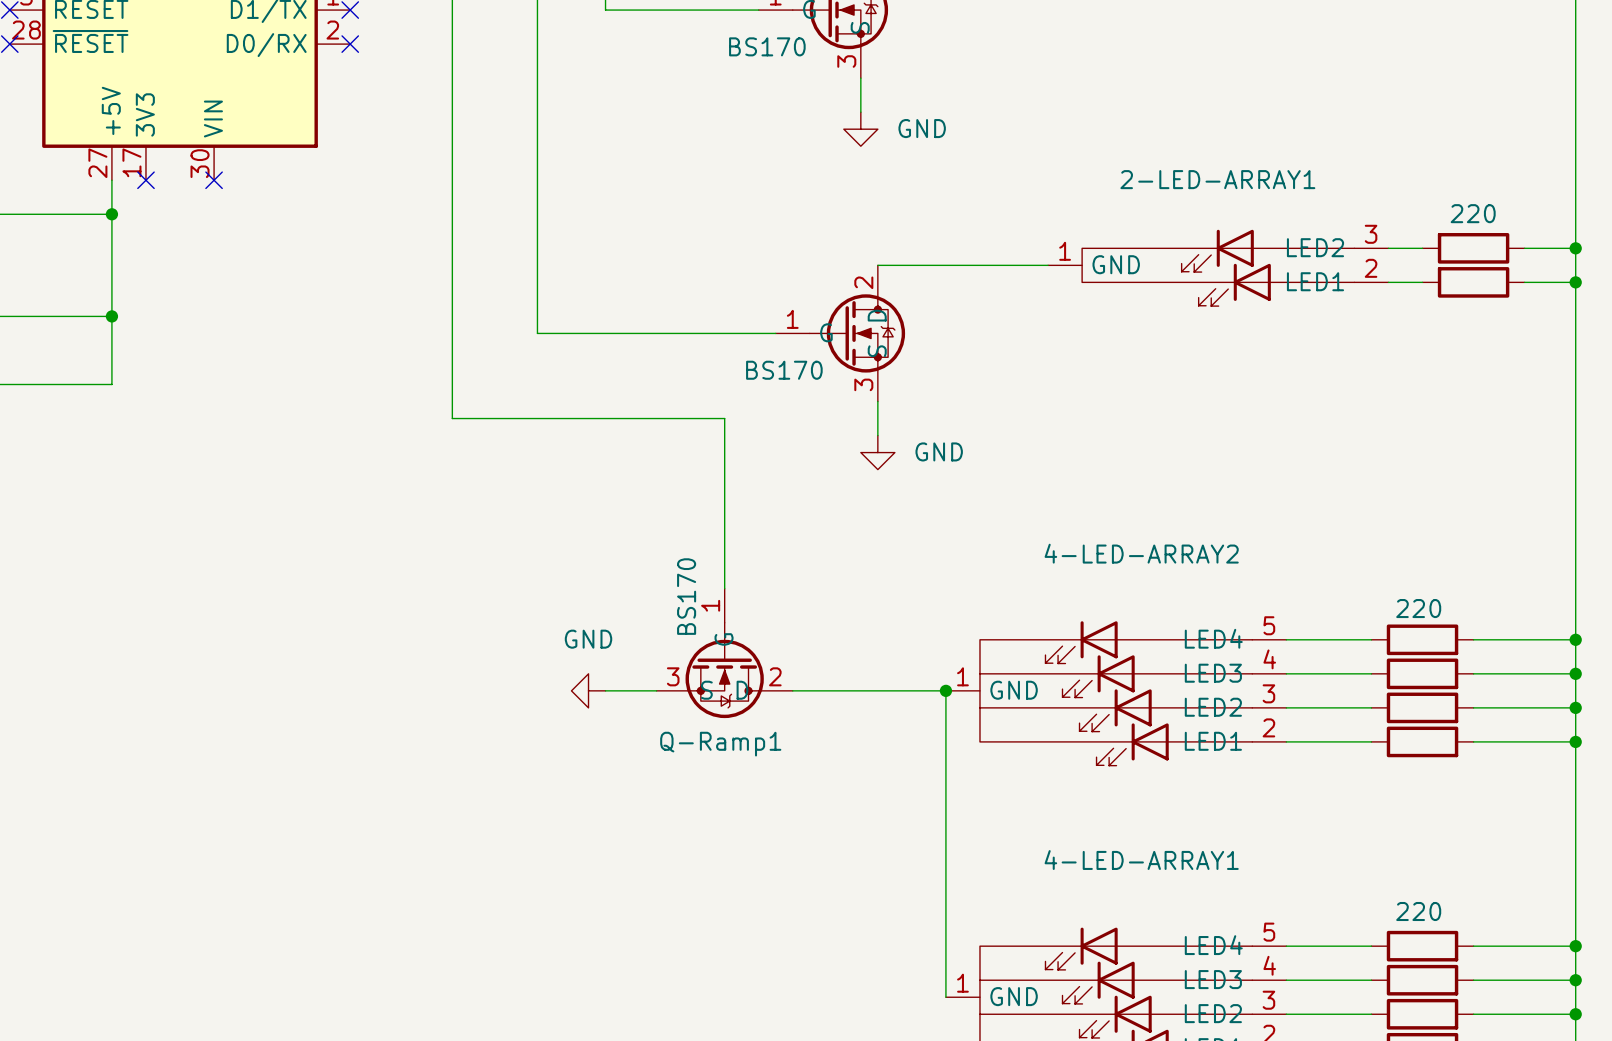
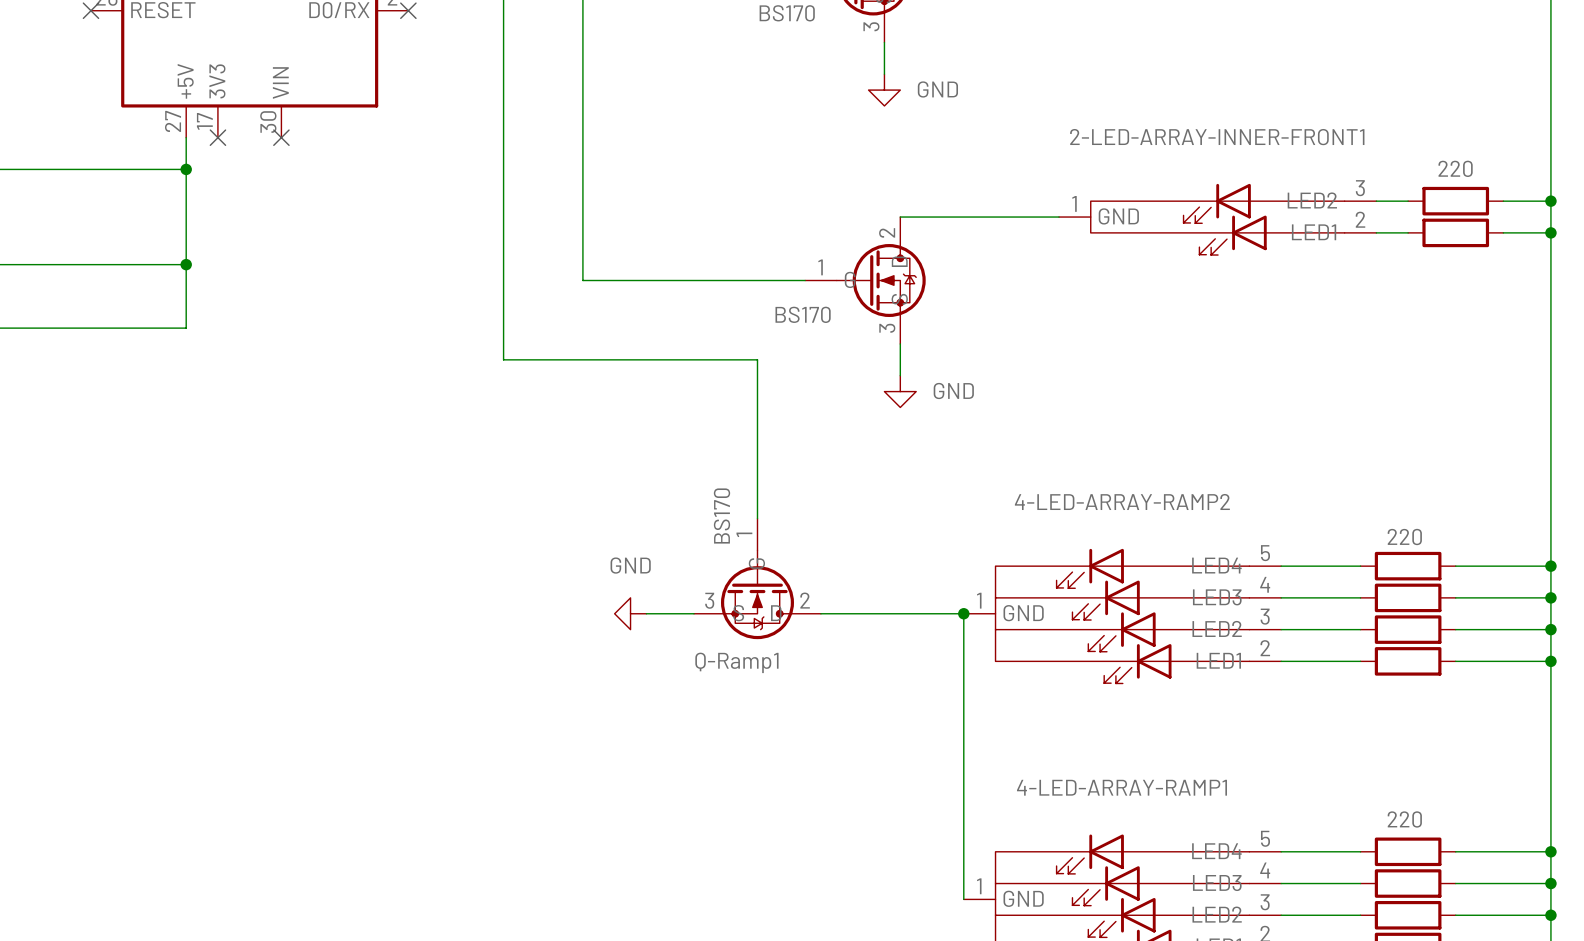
2-LED-ARRAY1 name: 2-LED-ARRAY1 (1217, 179) -> 2-LED-ARRAY-INNER-FRONT1 (1217, 137)
4-LED-ARRAY2 name: 4-LED-ARRAY2 (1141, 553) -> 4-LED-ARRAY-RAMP2 (1122, 501)
4-LED-ARRAY1 name: 4-LED-ARRAY1 (1141, 860) -> 4-LED-ARRAY-RAMP1 (1121, 787)

